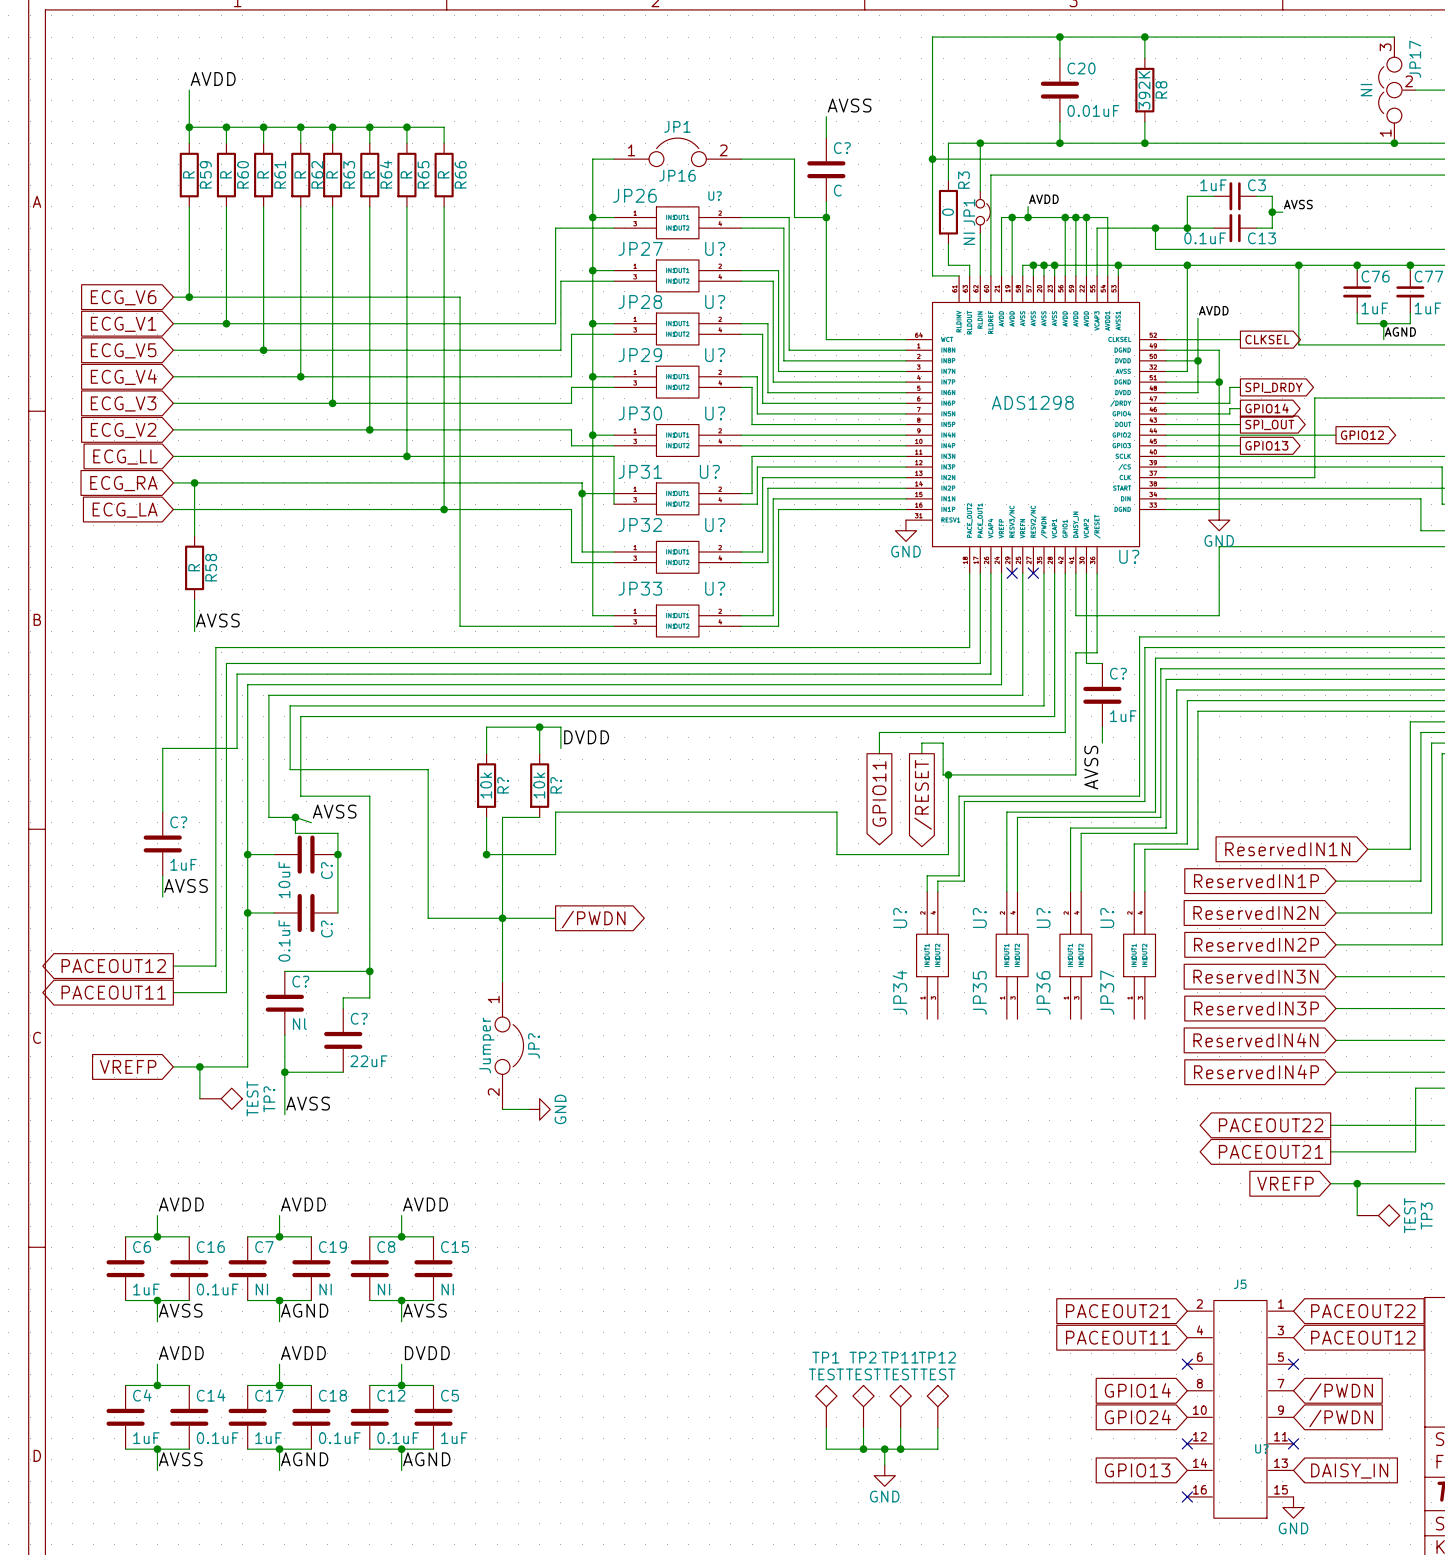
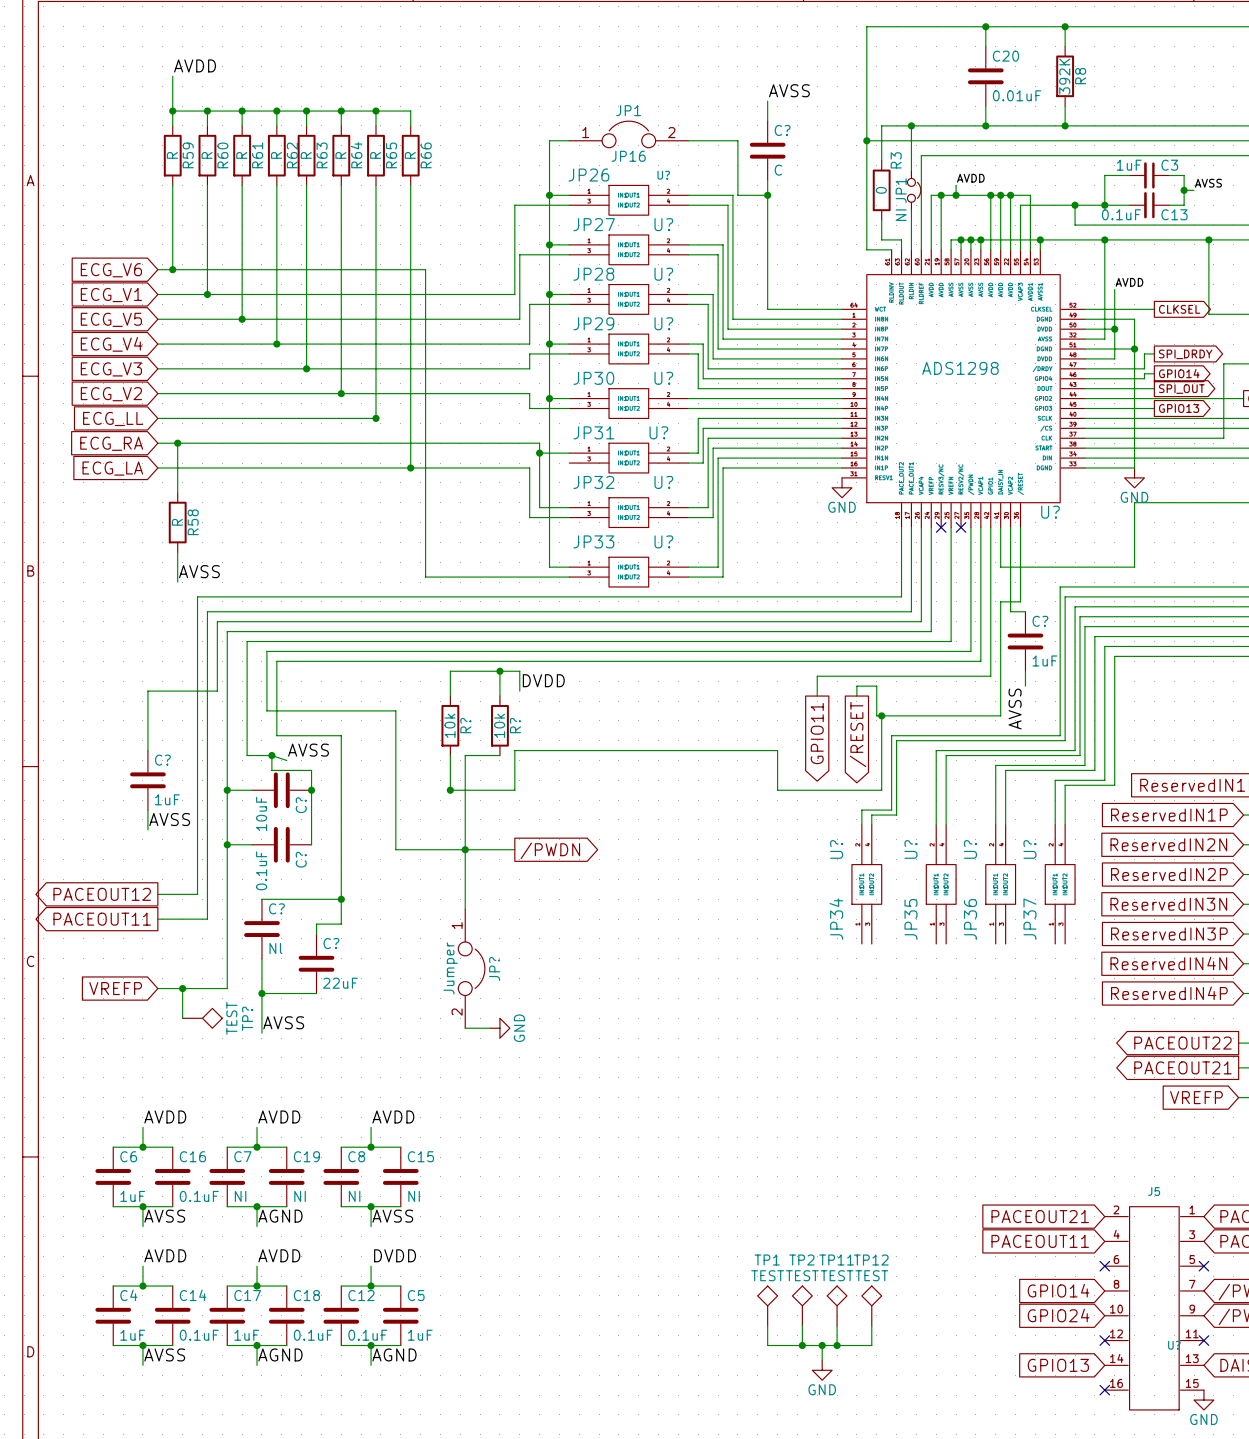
wire: (406, 456) (613, 456) (613, 504) -> none

